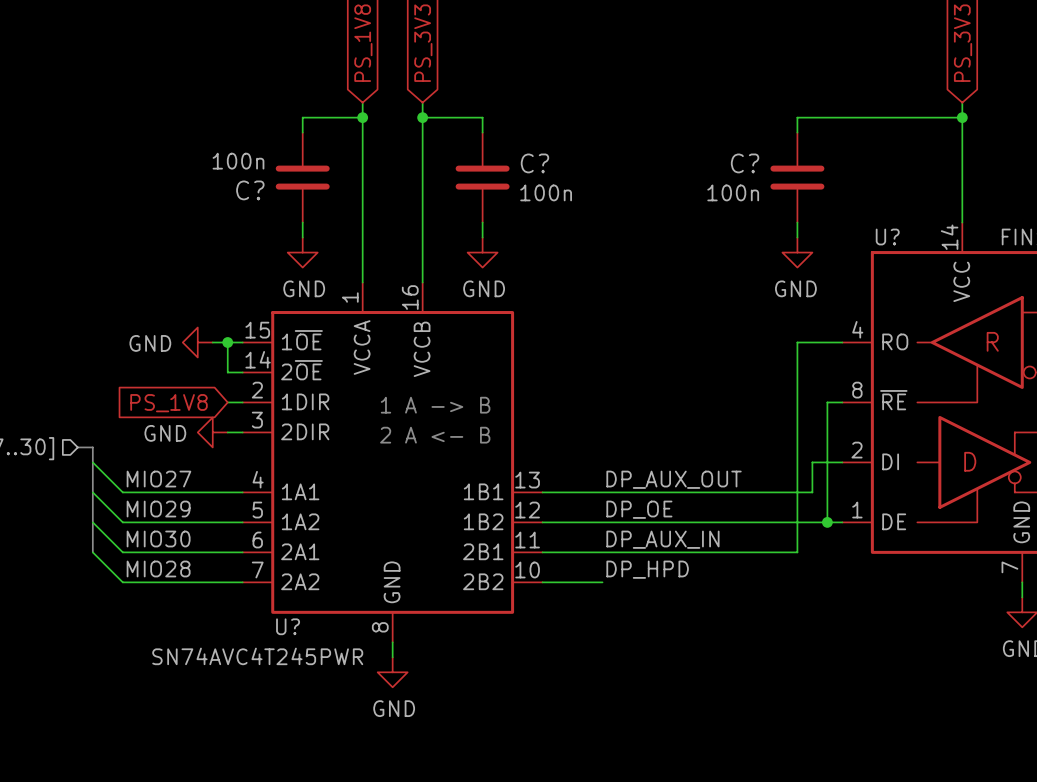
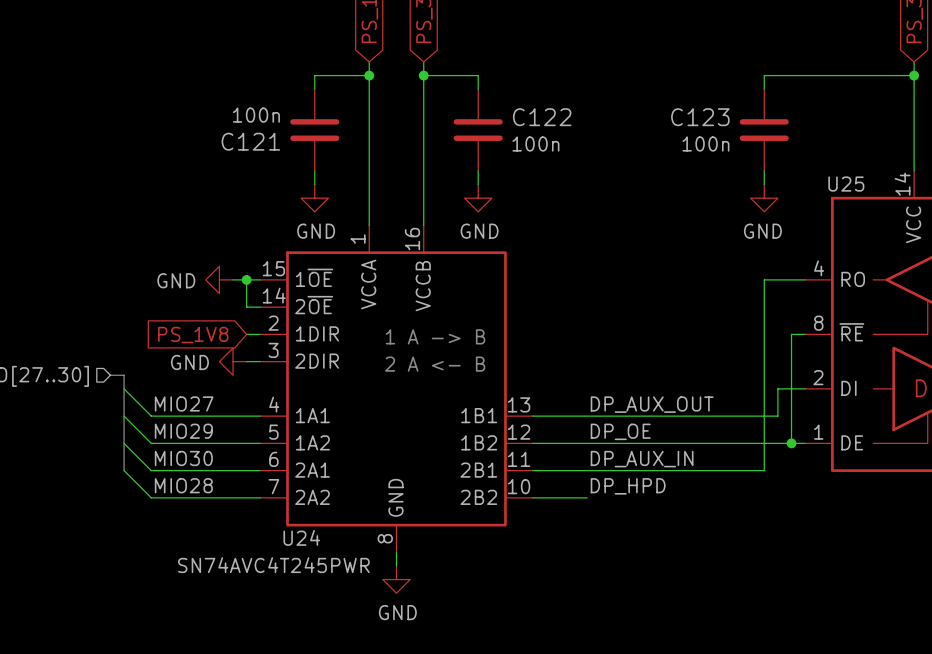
C? name: C? (534, 163) -> C122 (542, 117)
C? name: C? (745, 163) -> C123 (700, 117)
C? name: C? (250, 190) -> C121 (250, 141)
U? name: U? (887, 237) -> U25 (846, 184)
U? name: U? (288, 626) -> U24 (301, 537)

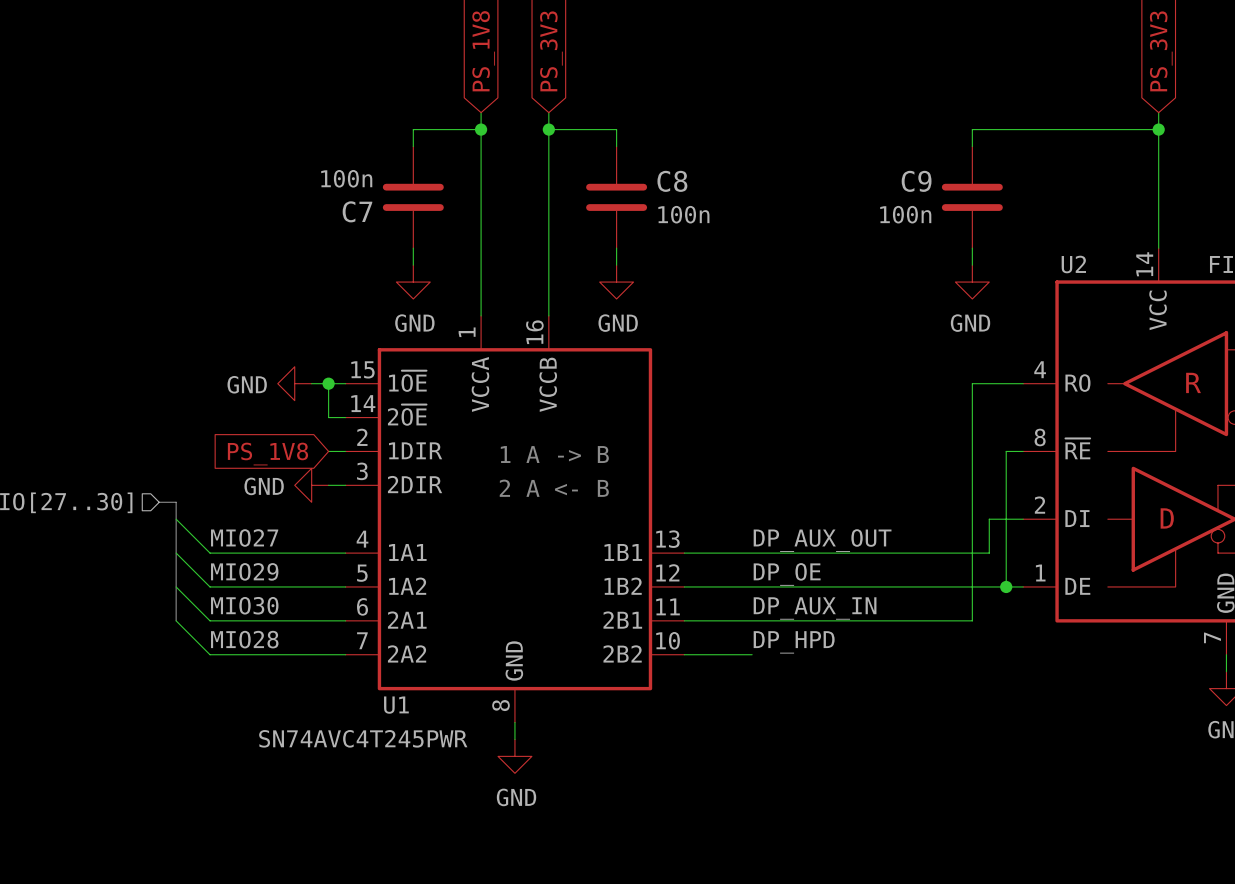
C122 name: C122 (542, 117) -> C8 (672, 181)
C123 name: C123 (700, 117) -> C9 (916, 181)
C121 name: C121 (250, 141) -> C7 (357, 211)
U25 name: U25 (846, 184) -> U2 (1073, 264)
U24 name: U24 (301, 537) -> U1 (396, 705)

